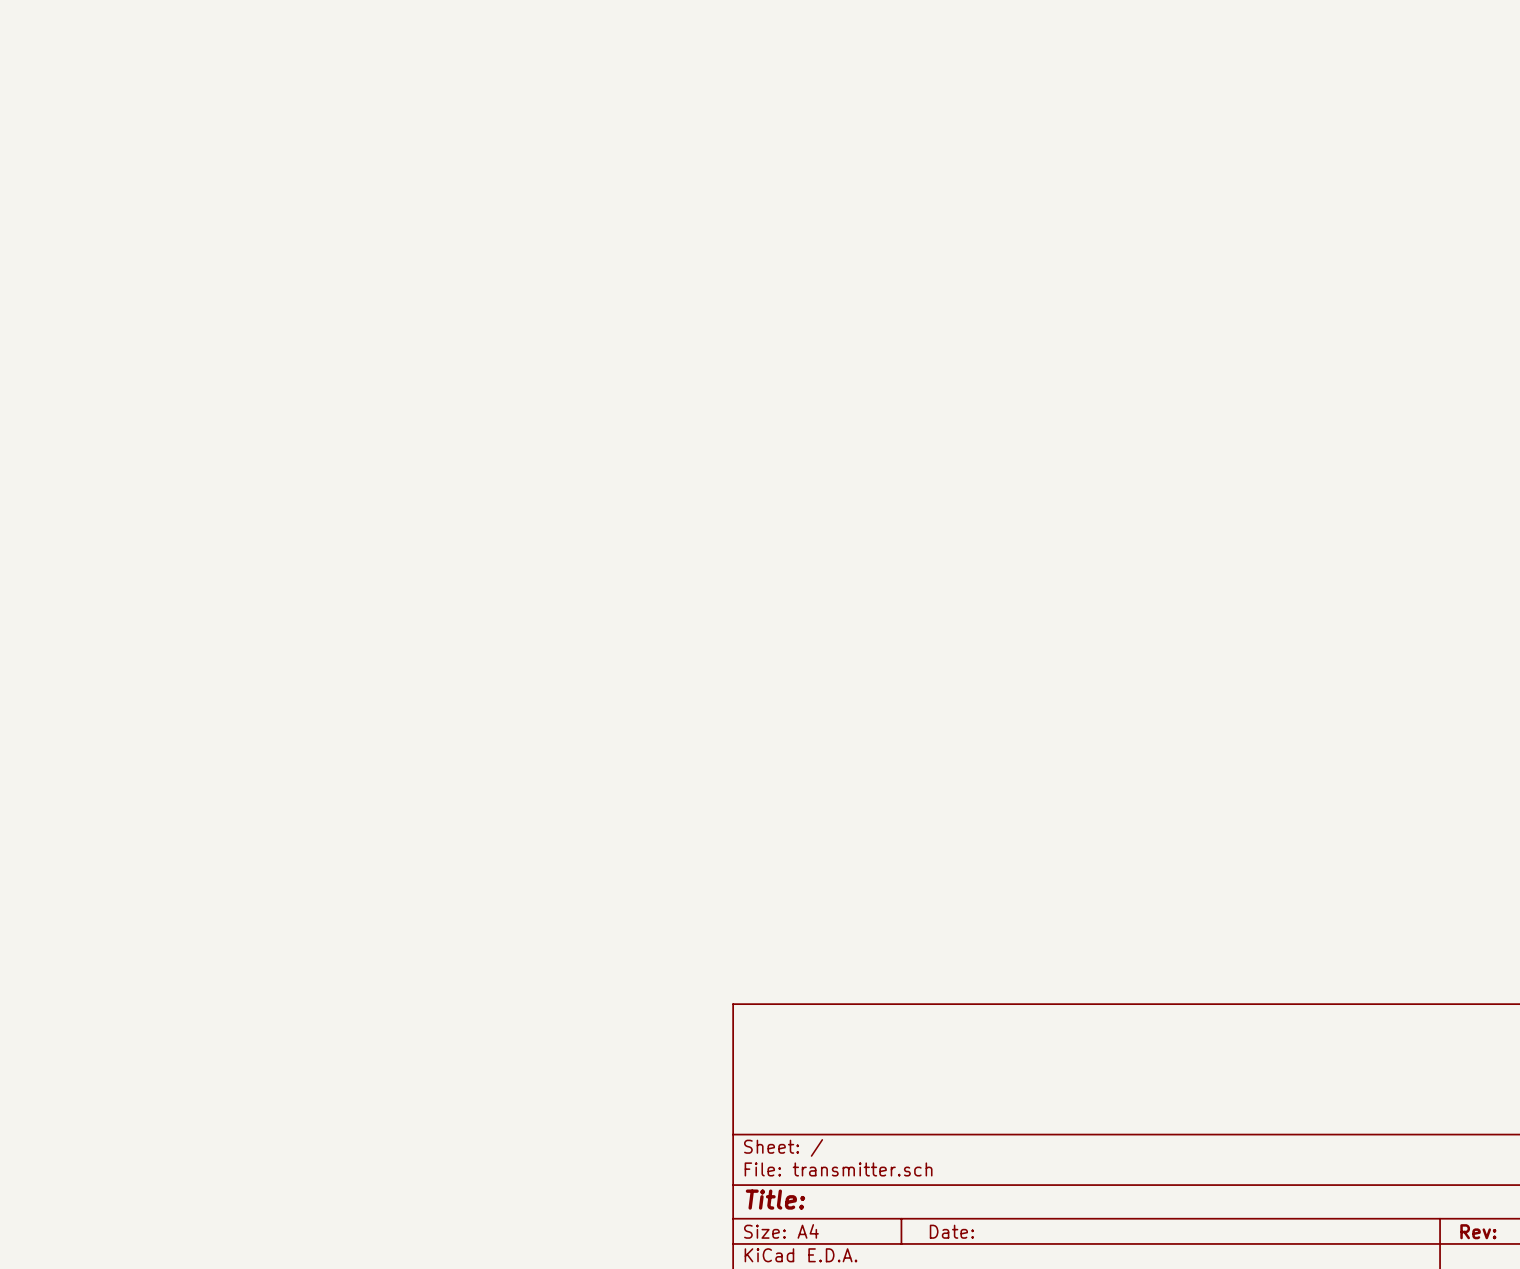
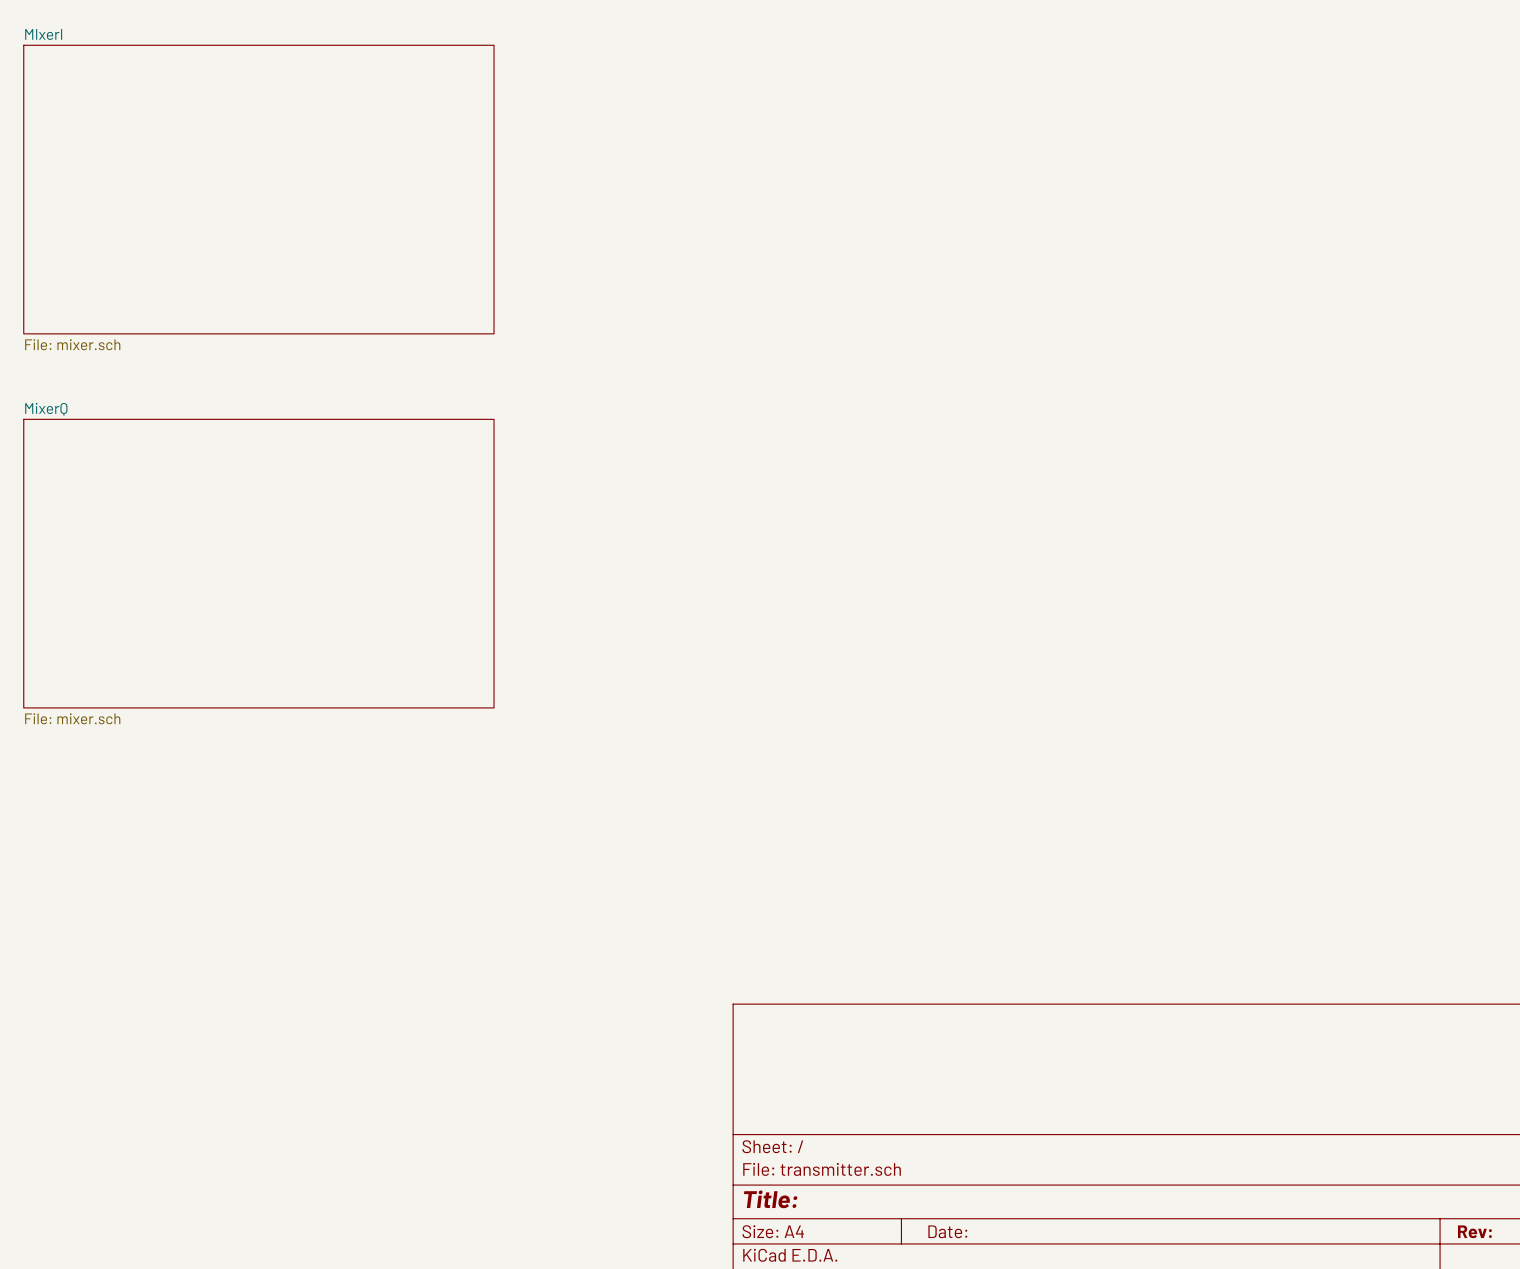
sheet MIxerI: none -> File: mixer.sch (258, 189)
sheet MixerQ: none -> File: mixer.sch (258, 563)

